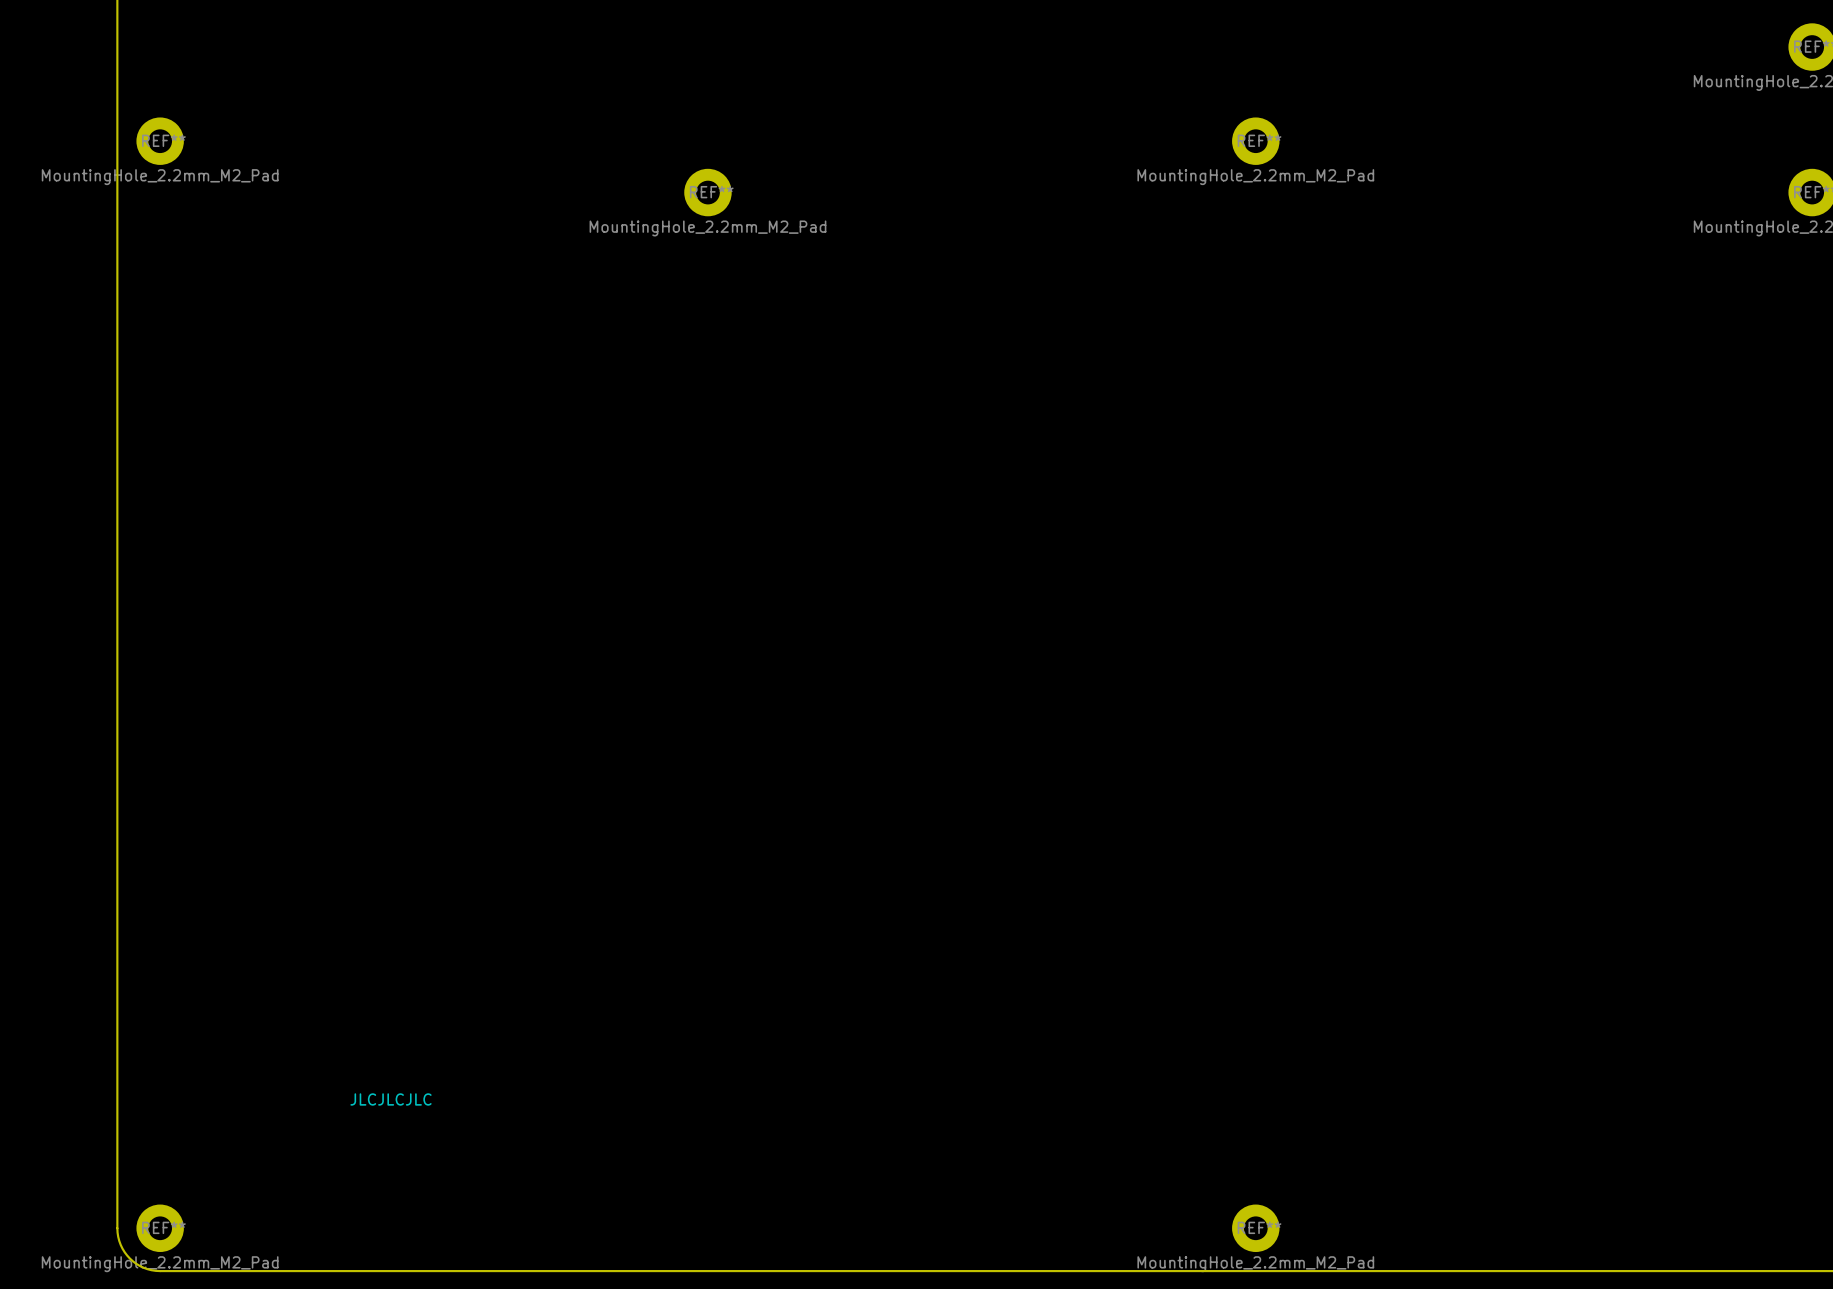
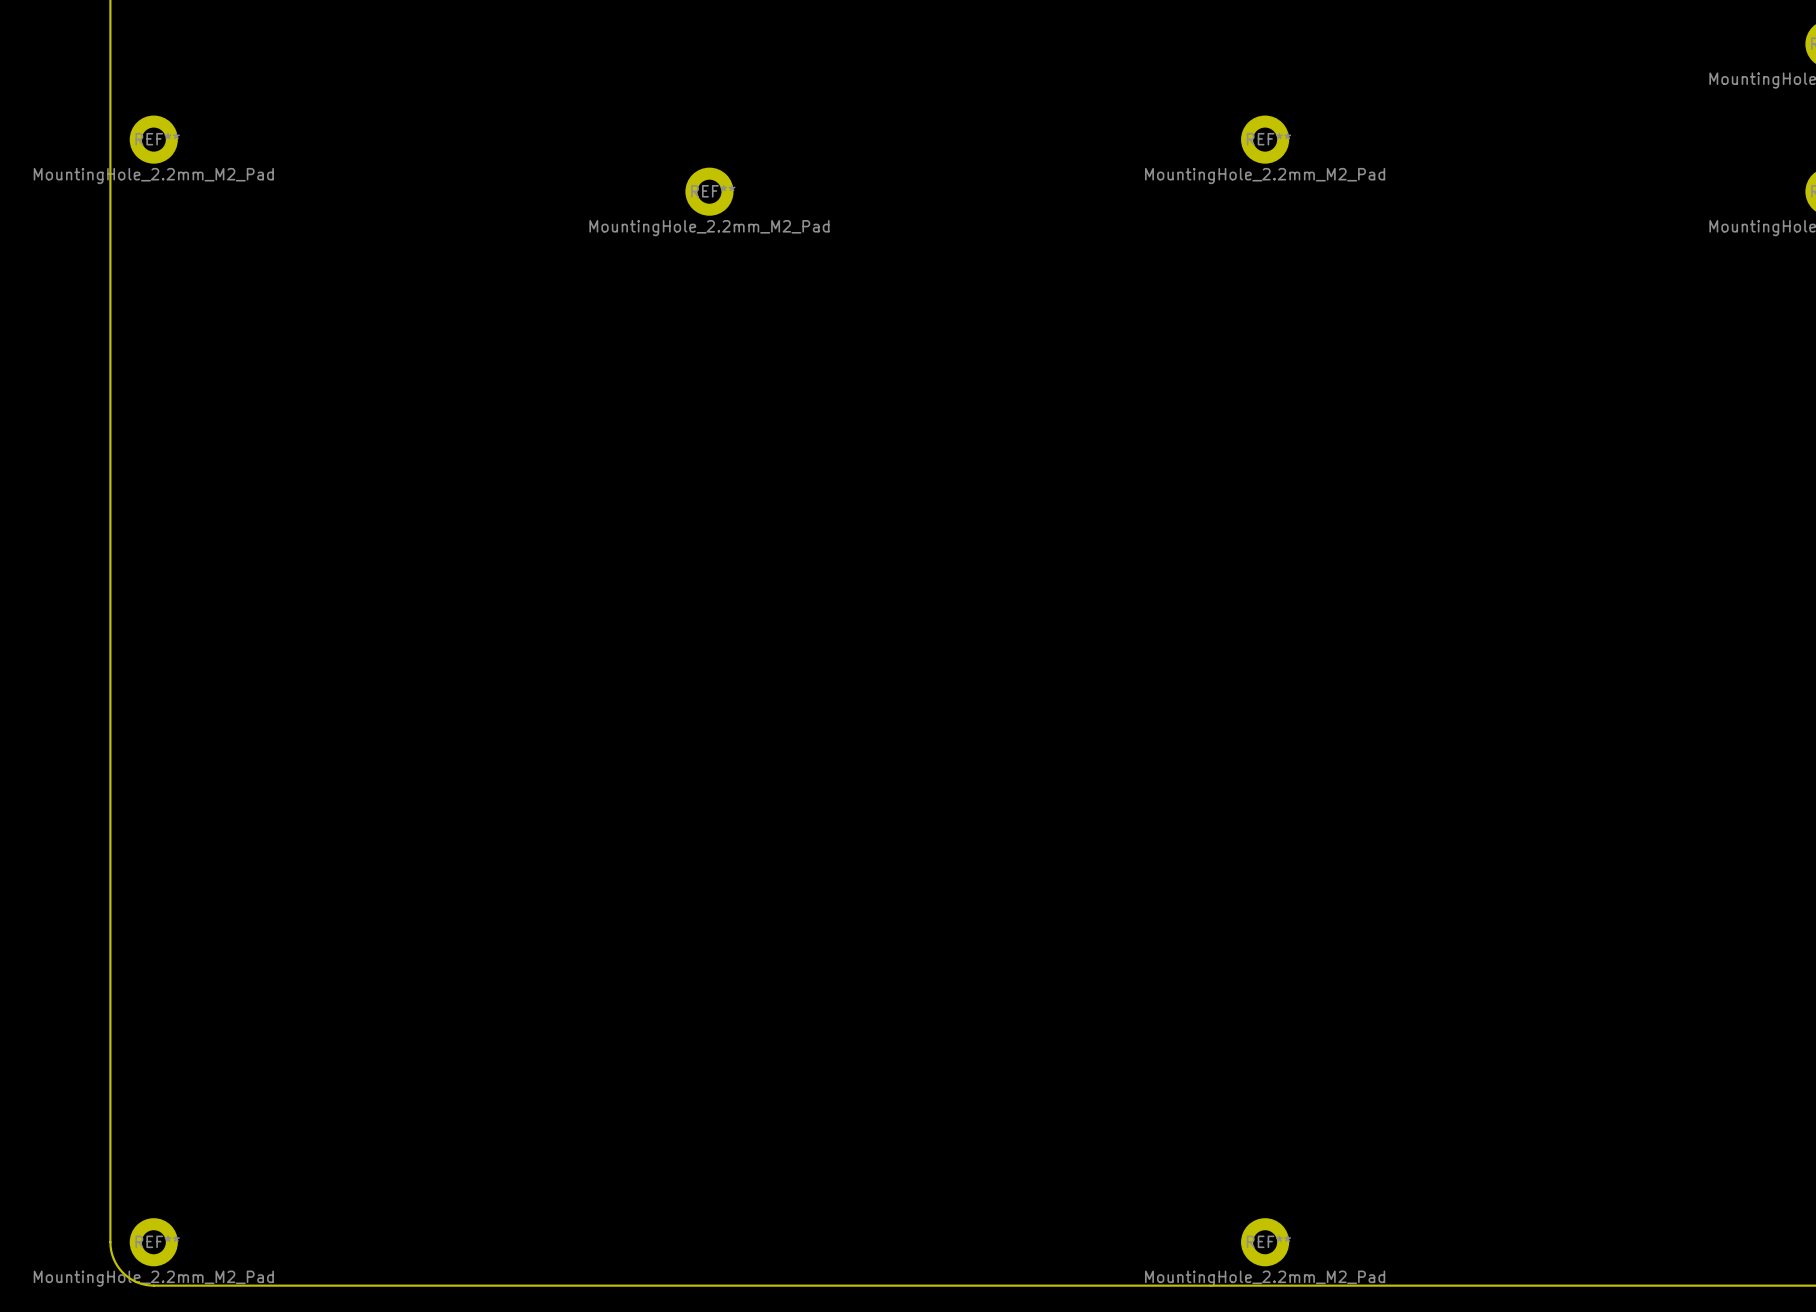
text: JLCJLCJLC (391, 1099) -> none

